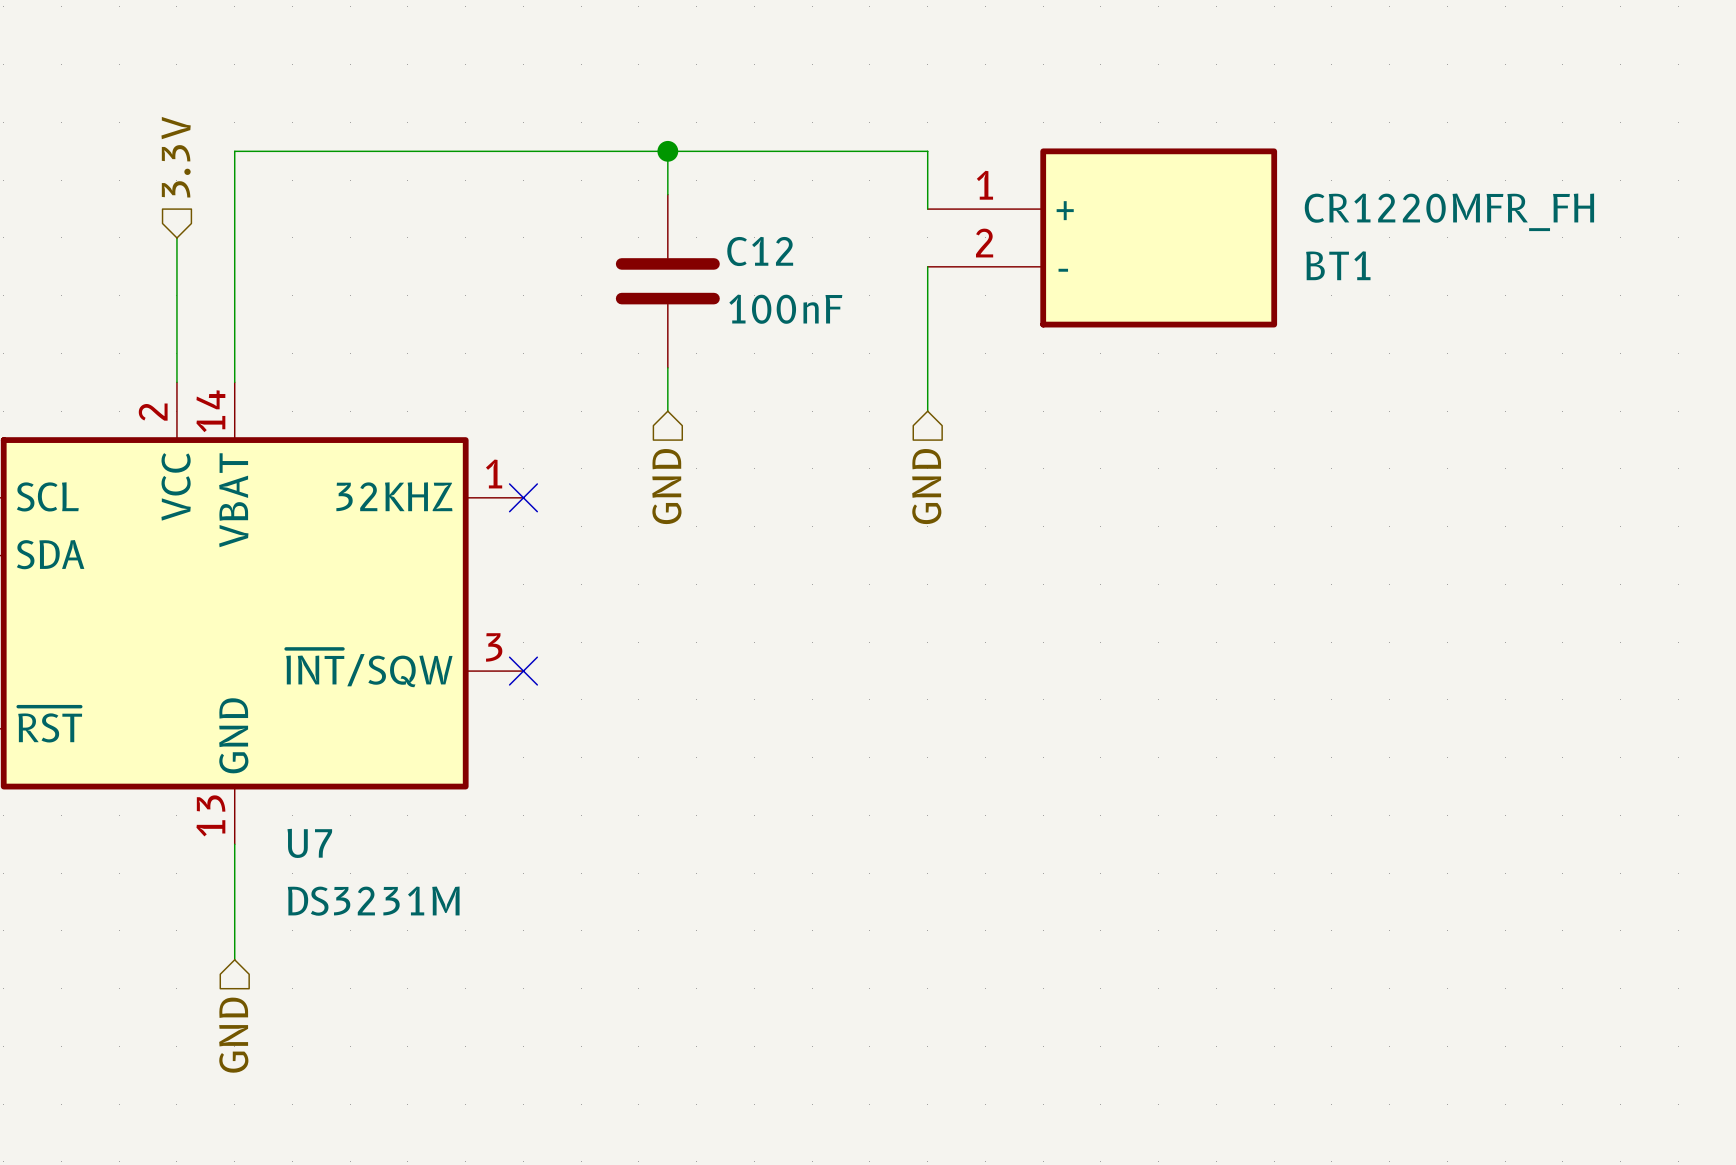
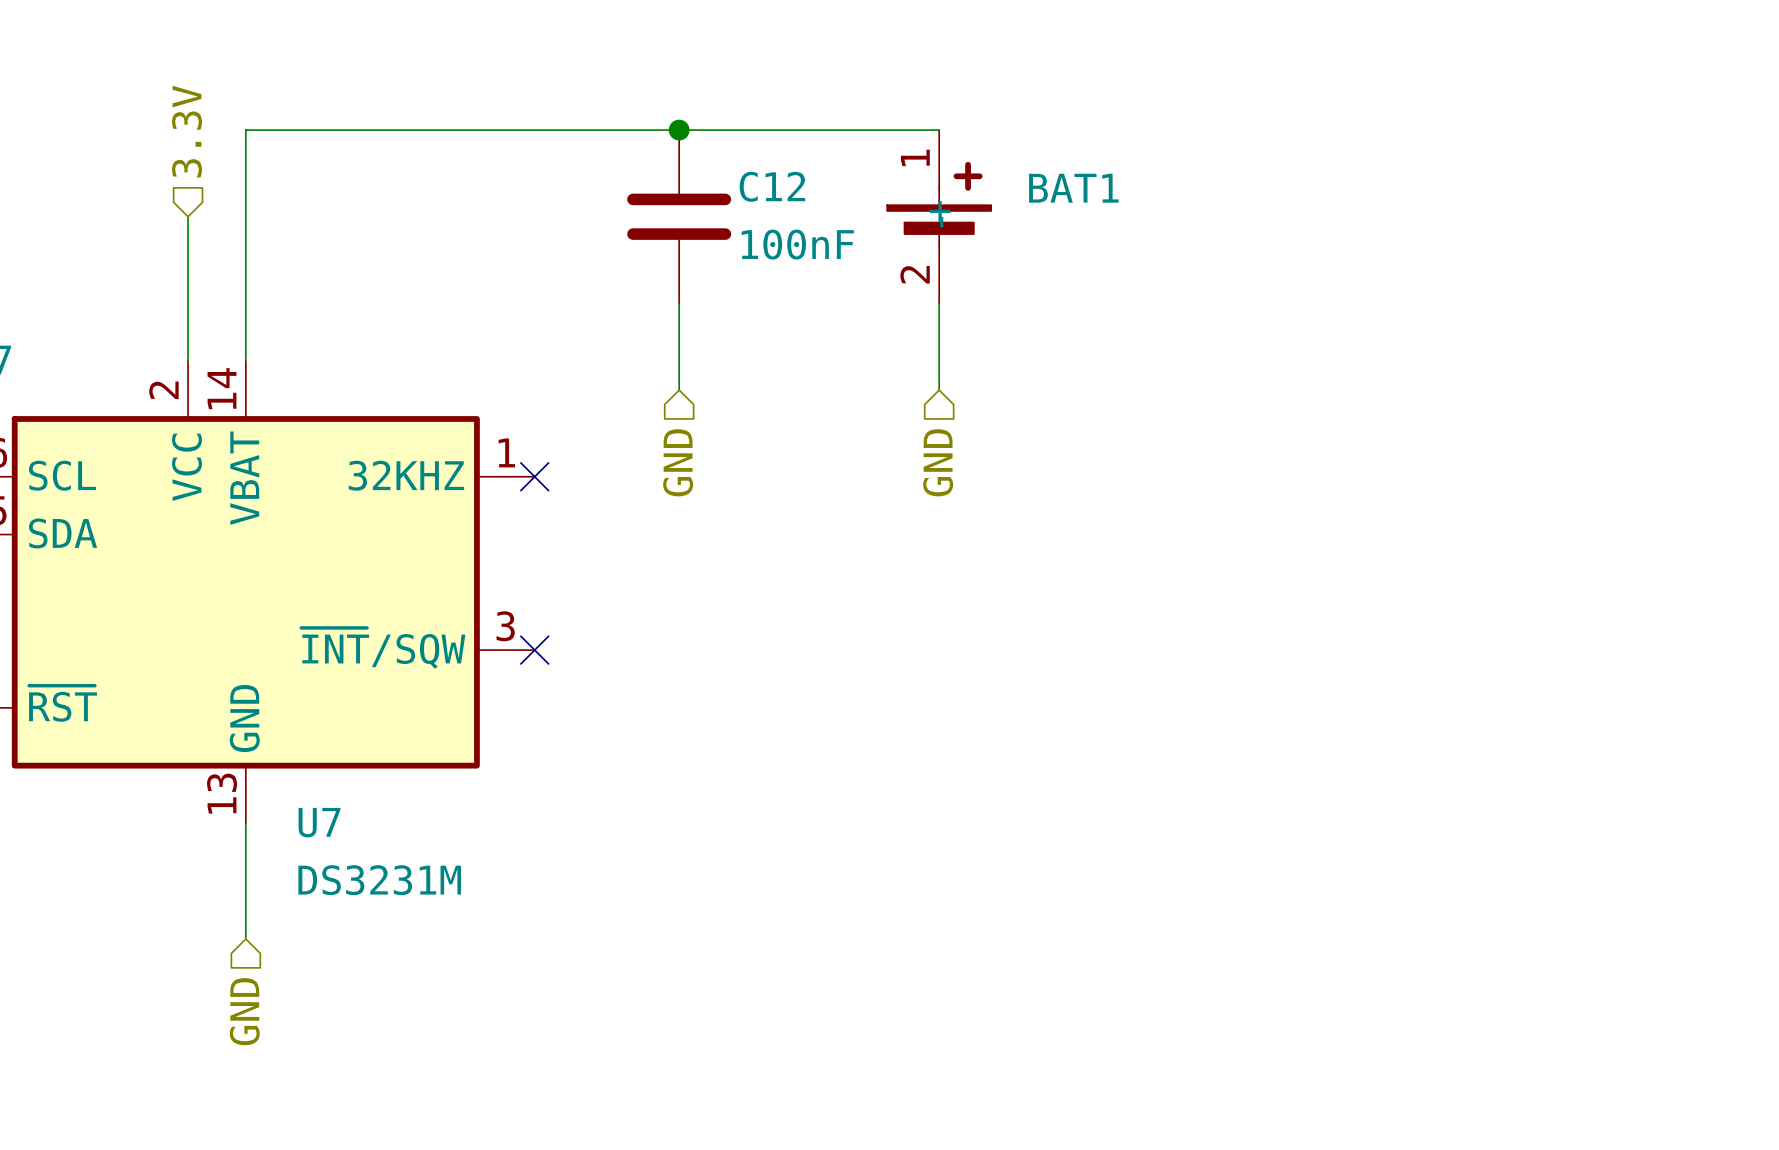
BAT1: none -> (939, 216)
BT1: CR1220MFR_FH (1102, 237) -> none
C12 position: (667, 281) -> (679, 216)

